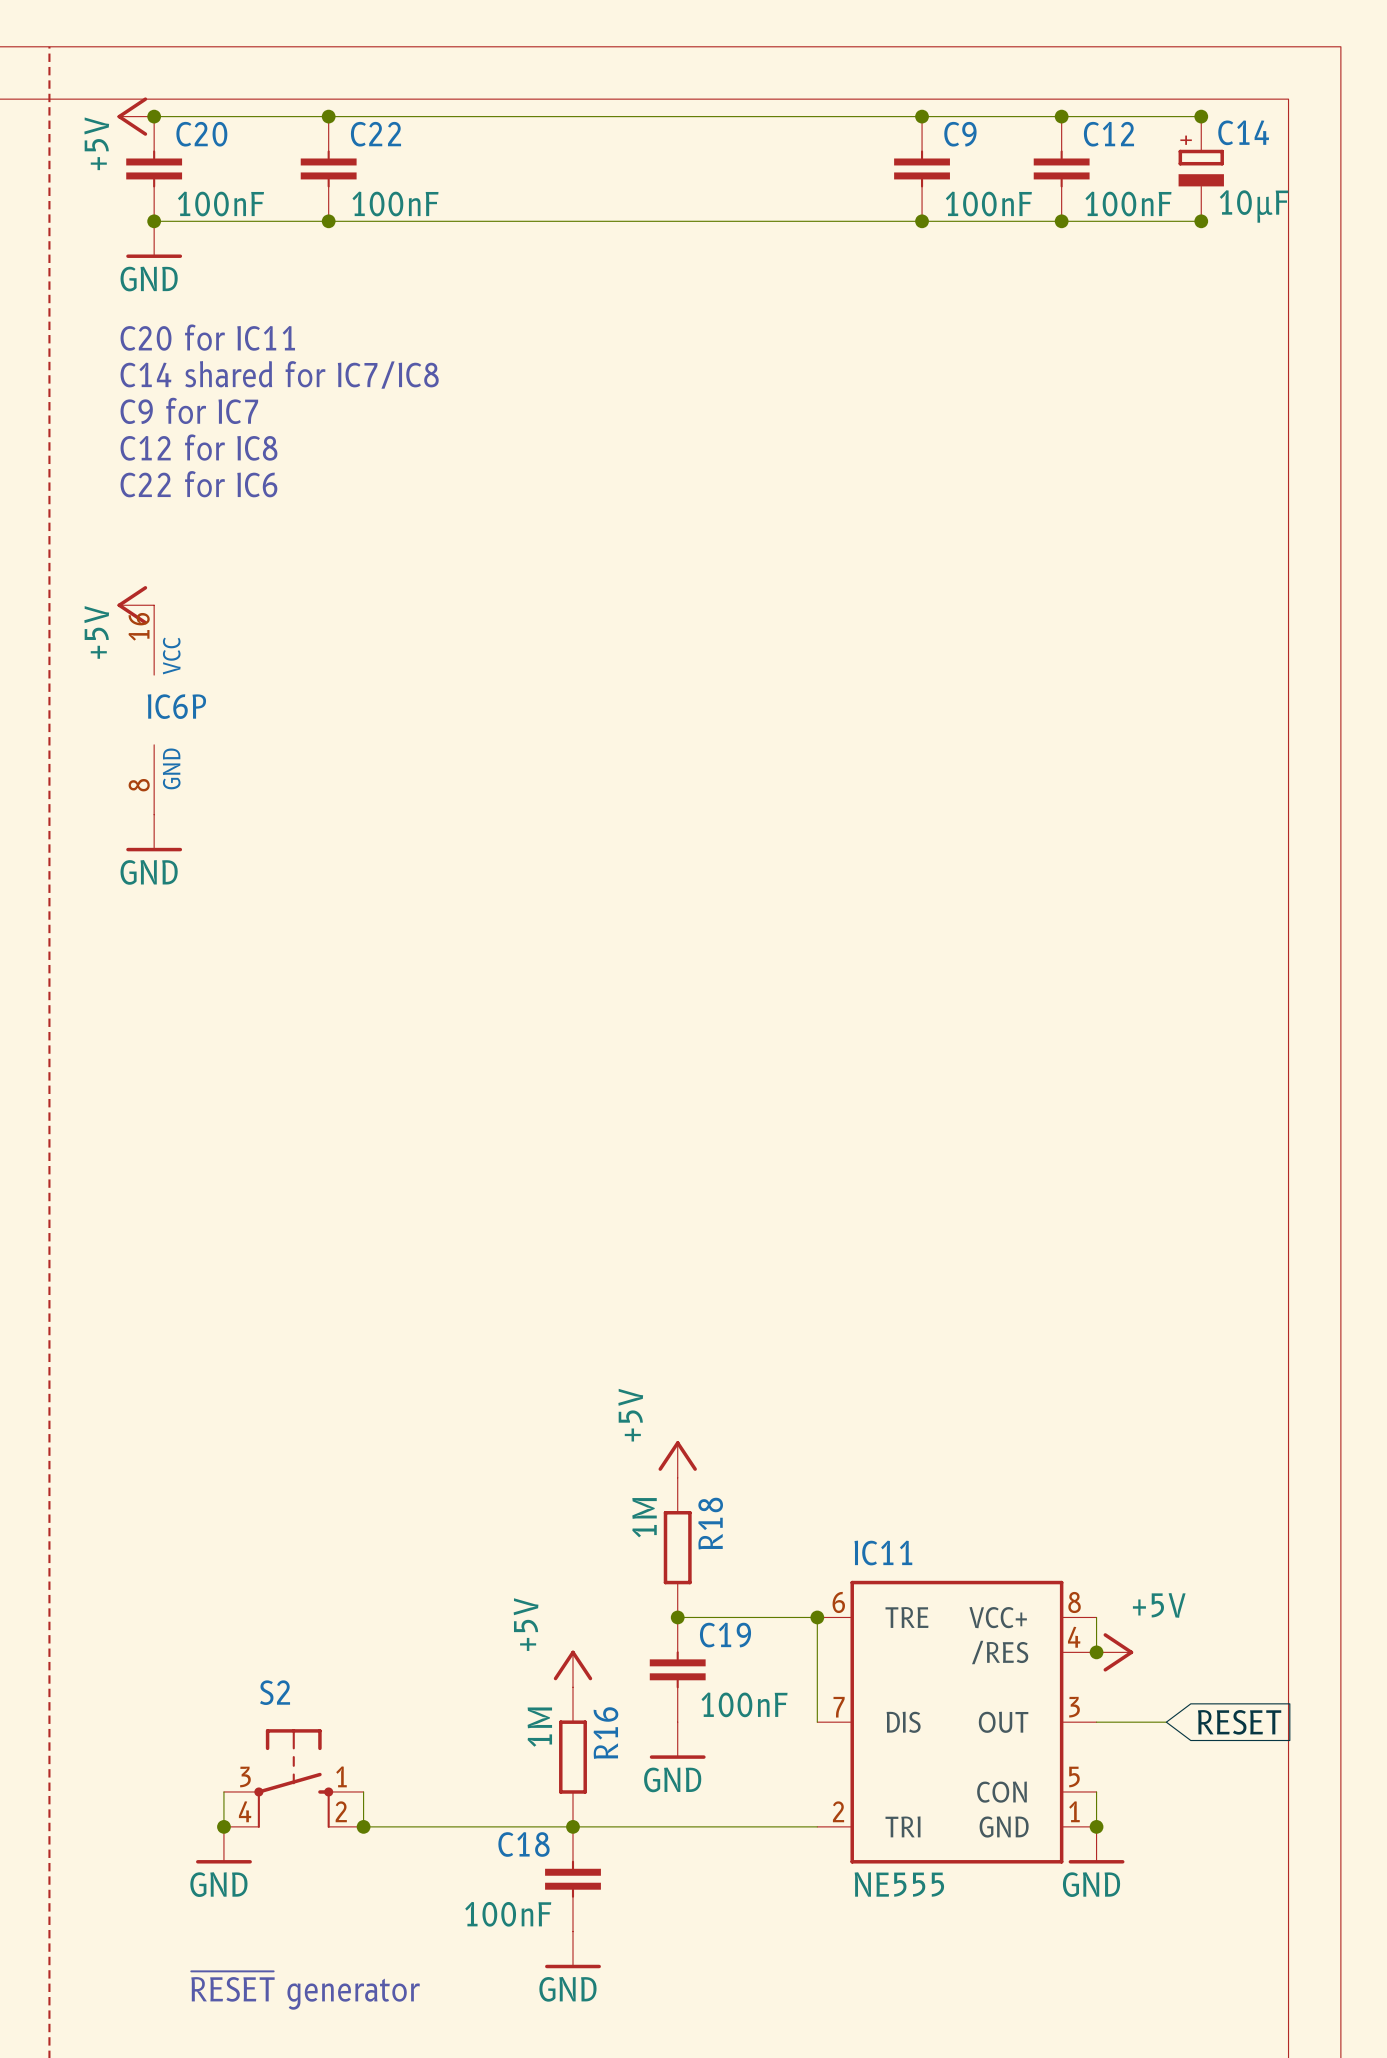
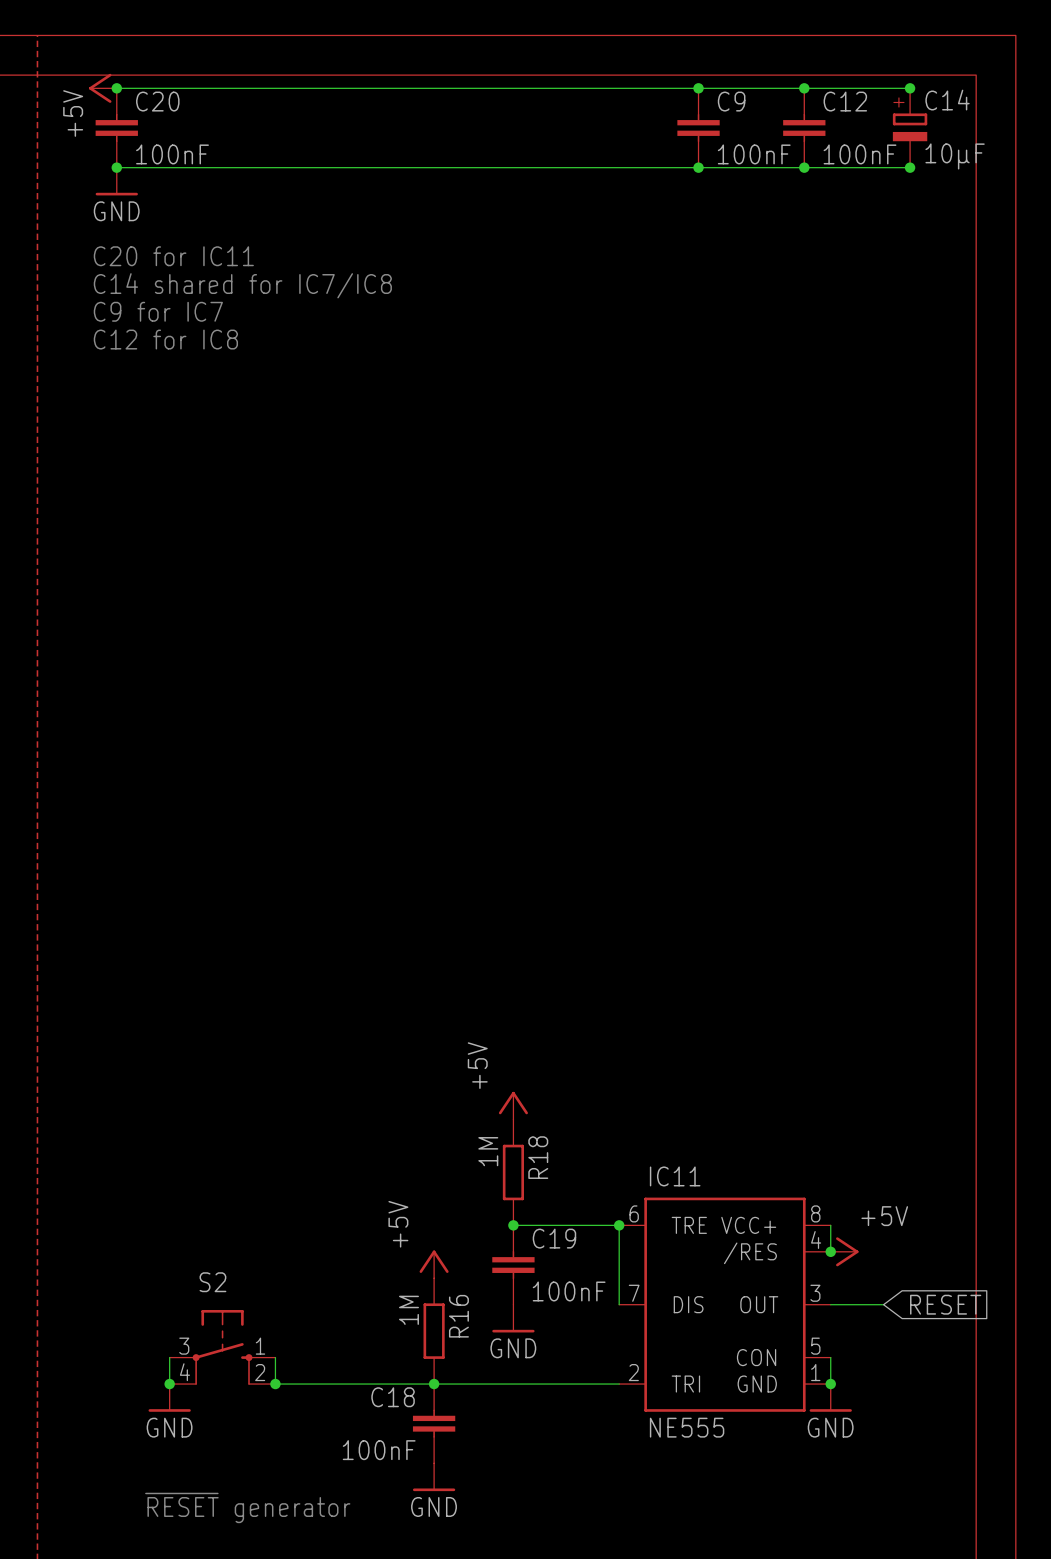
junction: (328, 116) -> none
C22: 100nF (328, 168) -> none
junction: (328, 221) -> none
text: C22 for IC6 (198, 484) -> none
power symbol: +5V (135, 605) -> none
IC6P: (154, 709) -> none
power symbol: GND (154, 833) -> none

